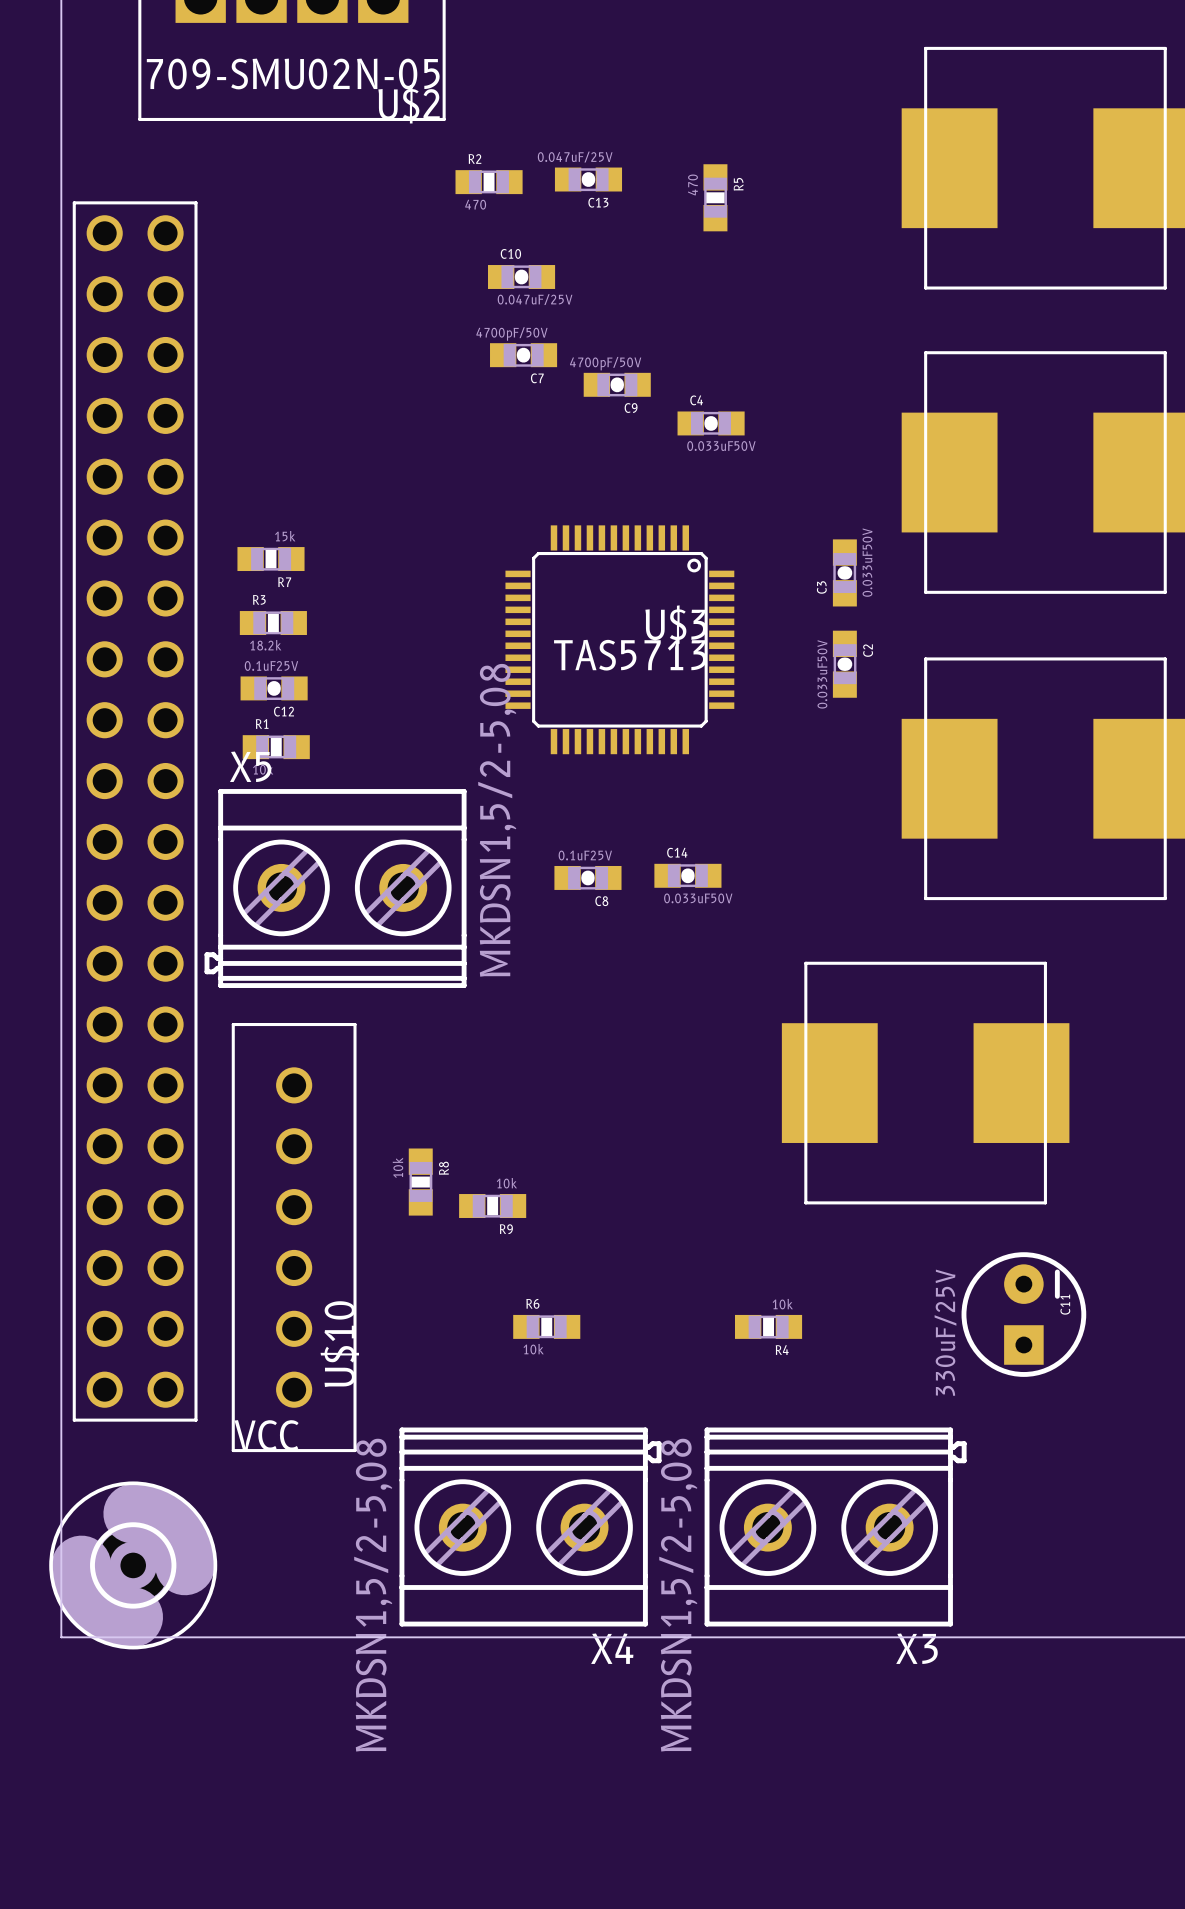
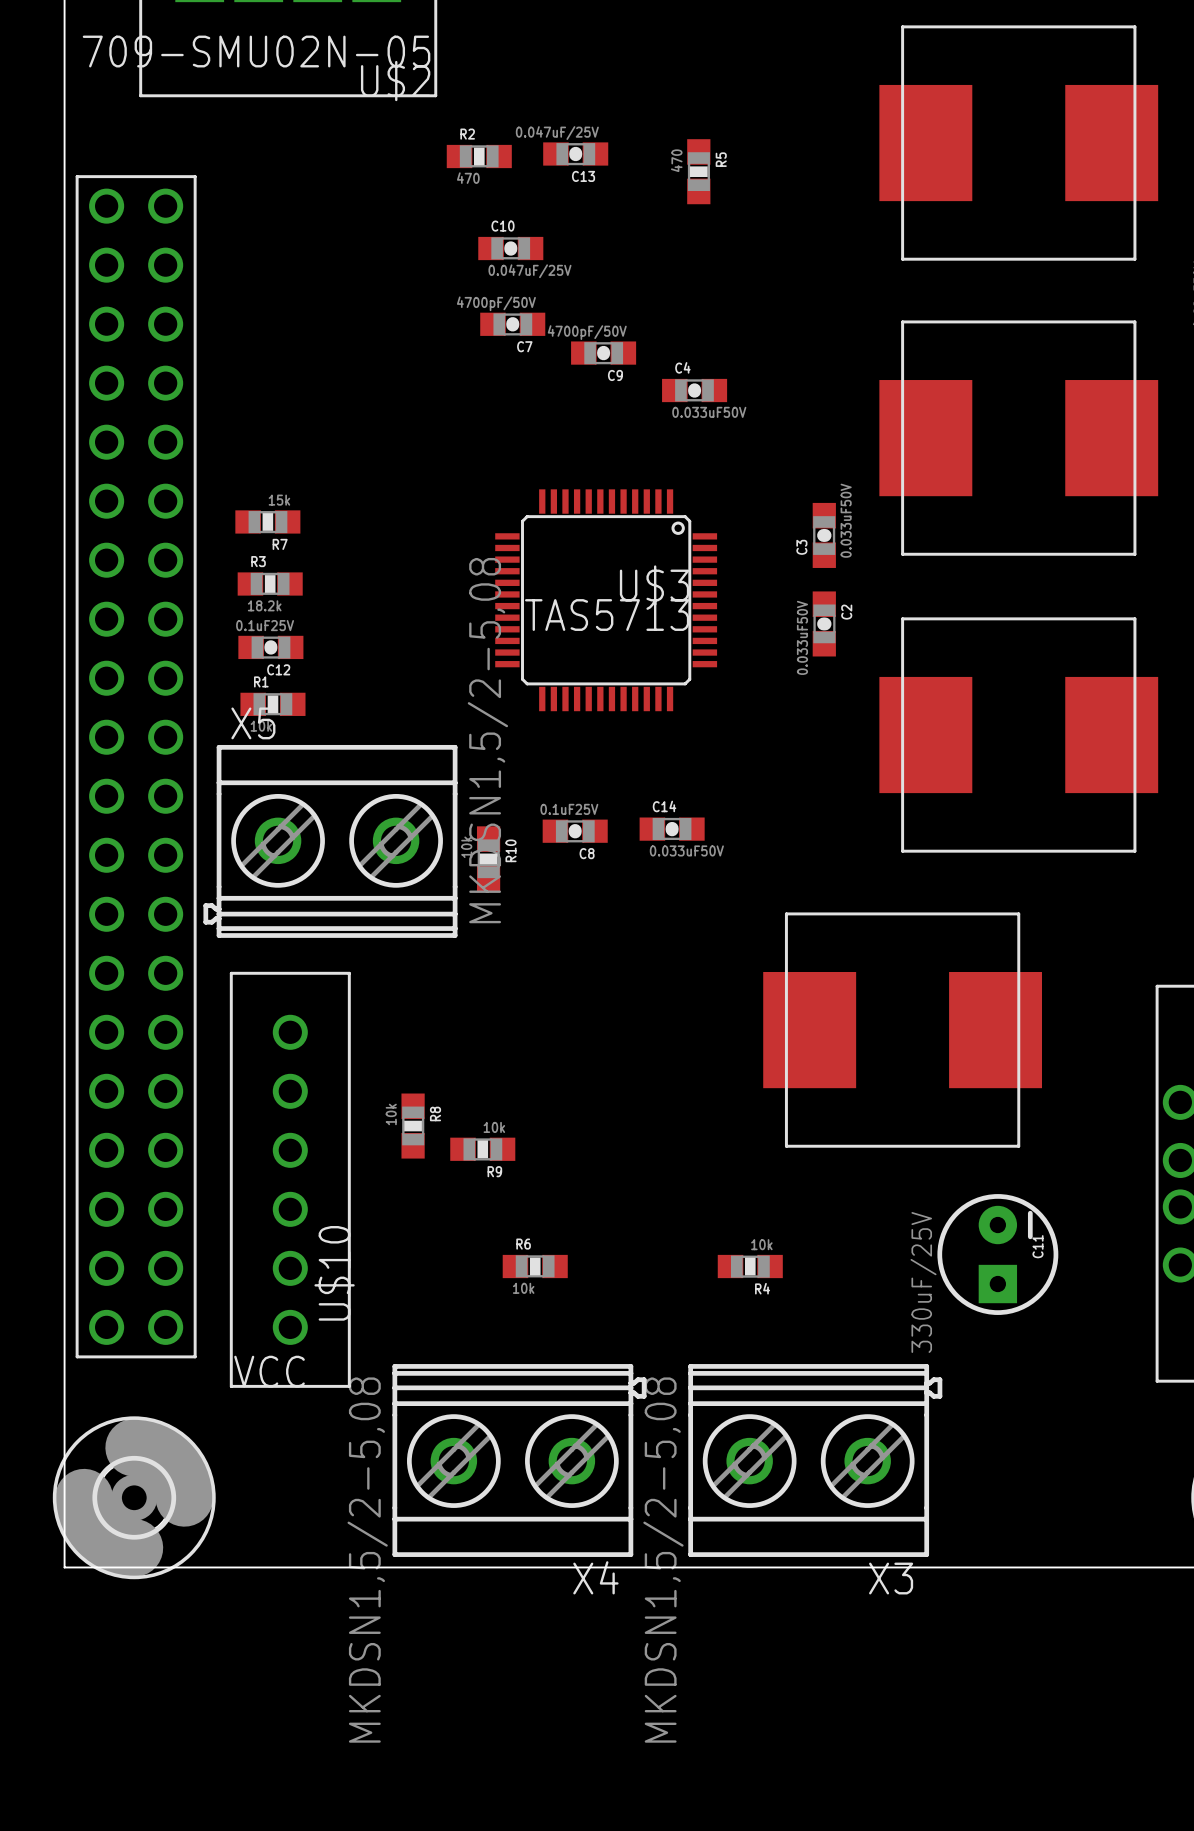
R10: none -> 10k (488, 858)

